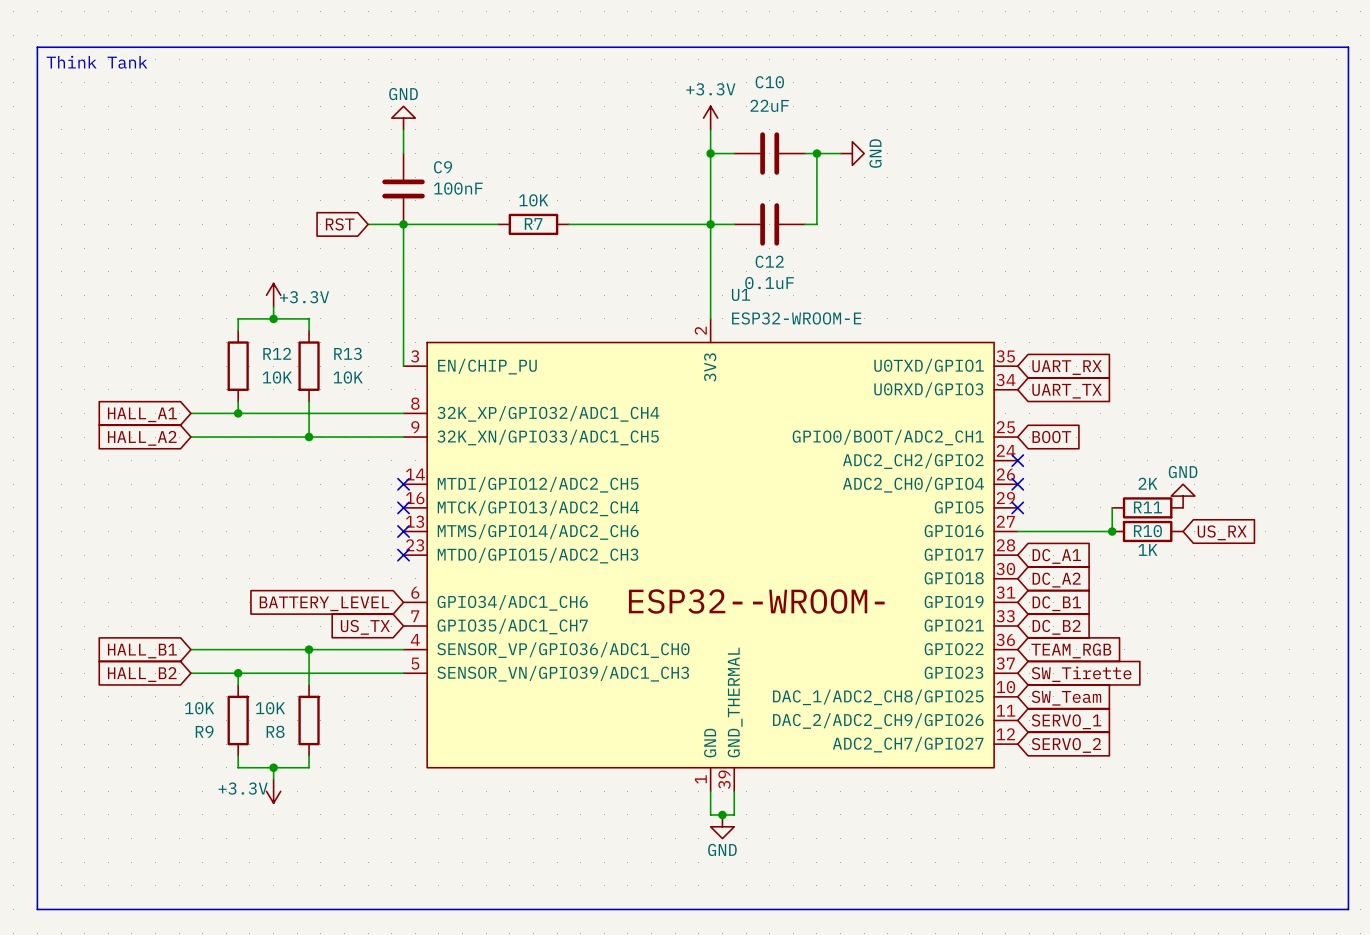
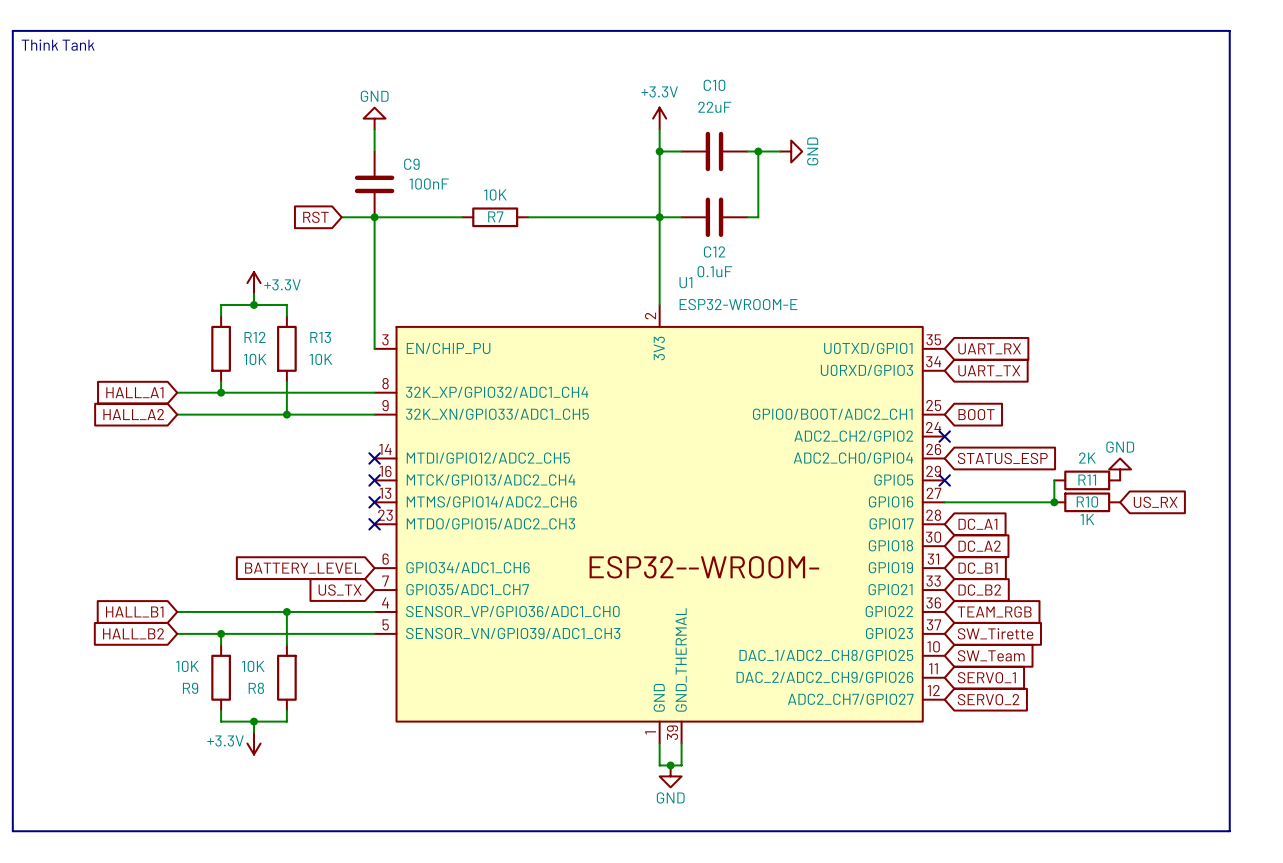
line: (37, 47) (1348, 47) (1348, 909) (37, 909) (37, 47) -> (12, 30) (1229, 30) (1229, 831) (12, 831) (12, 30)
text position: Think Tank (97, 62) -> Think Tank (58, 45)
no-connect mark: (1017, 484) -> none
global label: none -> STATUS_ESP (1002, 458)
power symbol position: GND (1183, 496) -> GND (1120, 469)
wire: (1112, 507) (1112, 531) -> (1054, 480) (1054, 502) (1032, 502)
R11 position: (1147, 507) -> (1087, 480)
junction position: (1112, 531) -> (1054, 502)
R10 position: (1147, 531) -> (1087, 502)
global label position: US_RX (1222, 532) -> US_RX (1155, 502)

